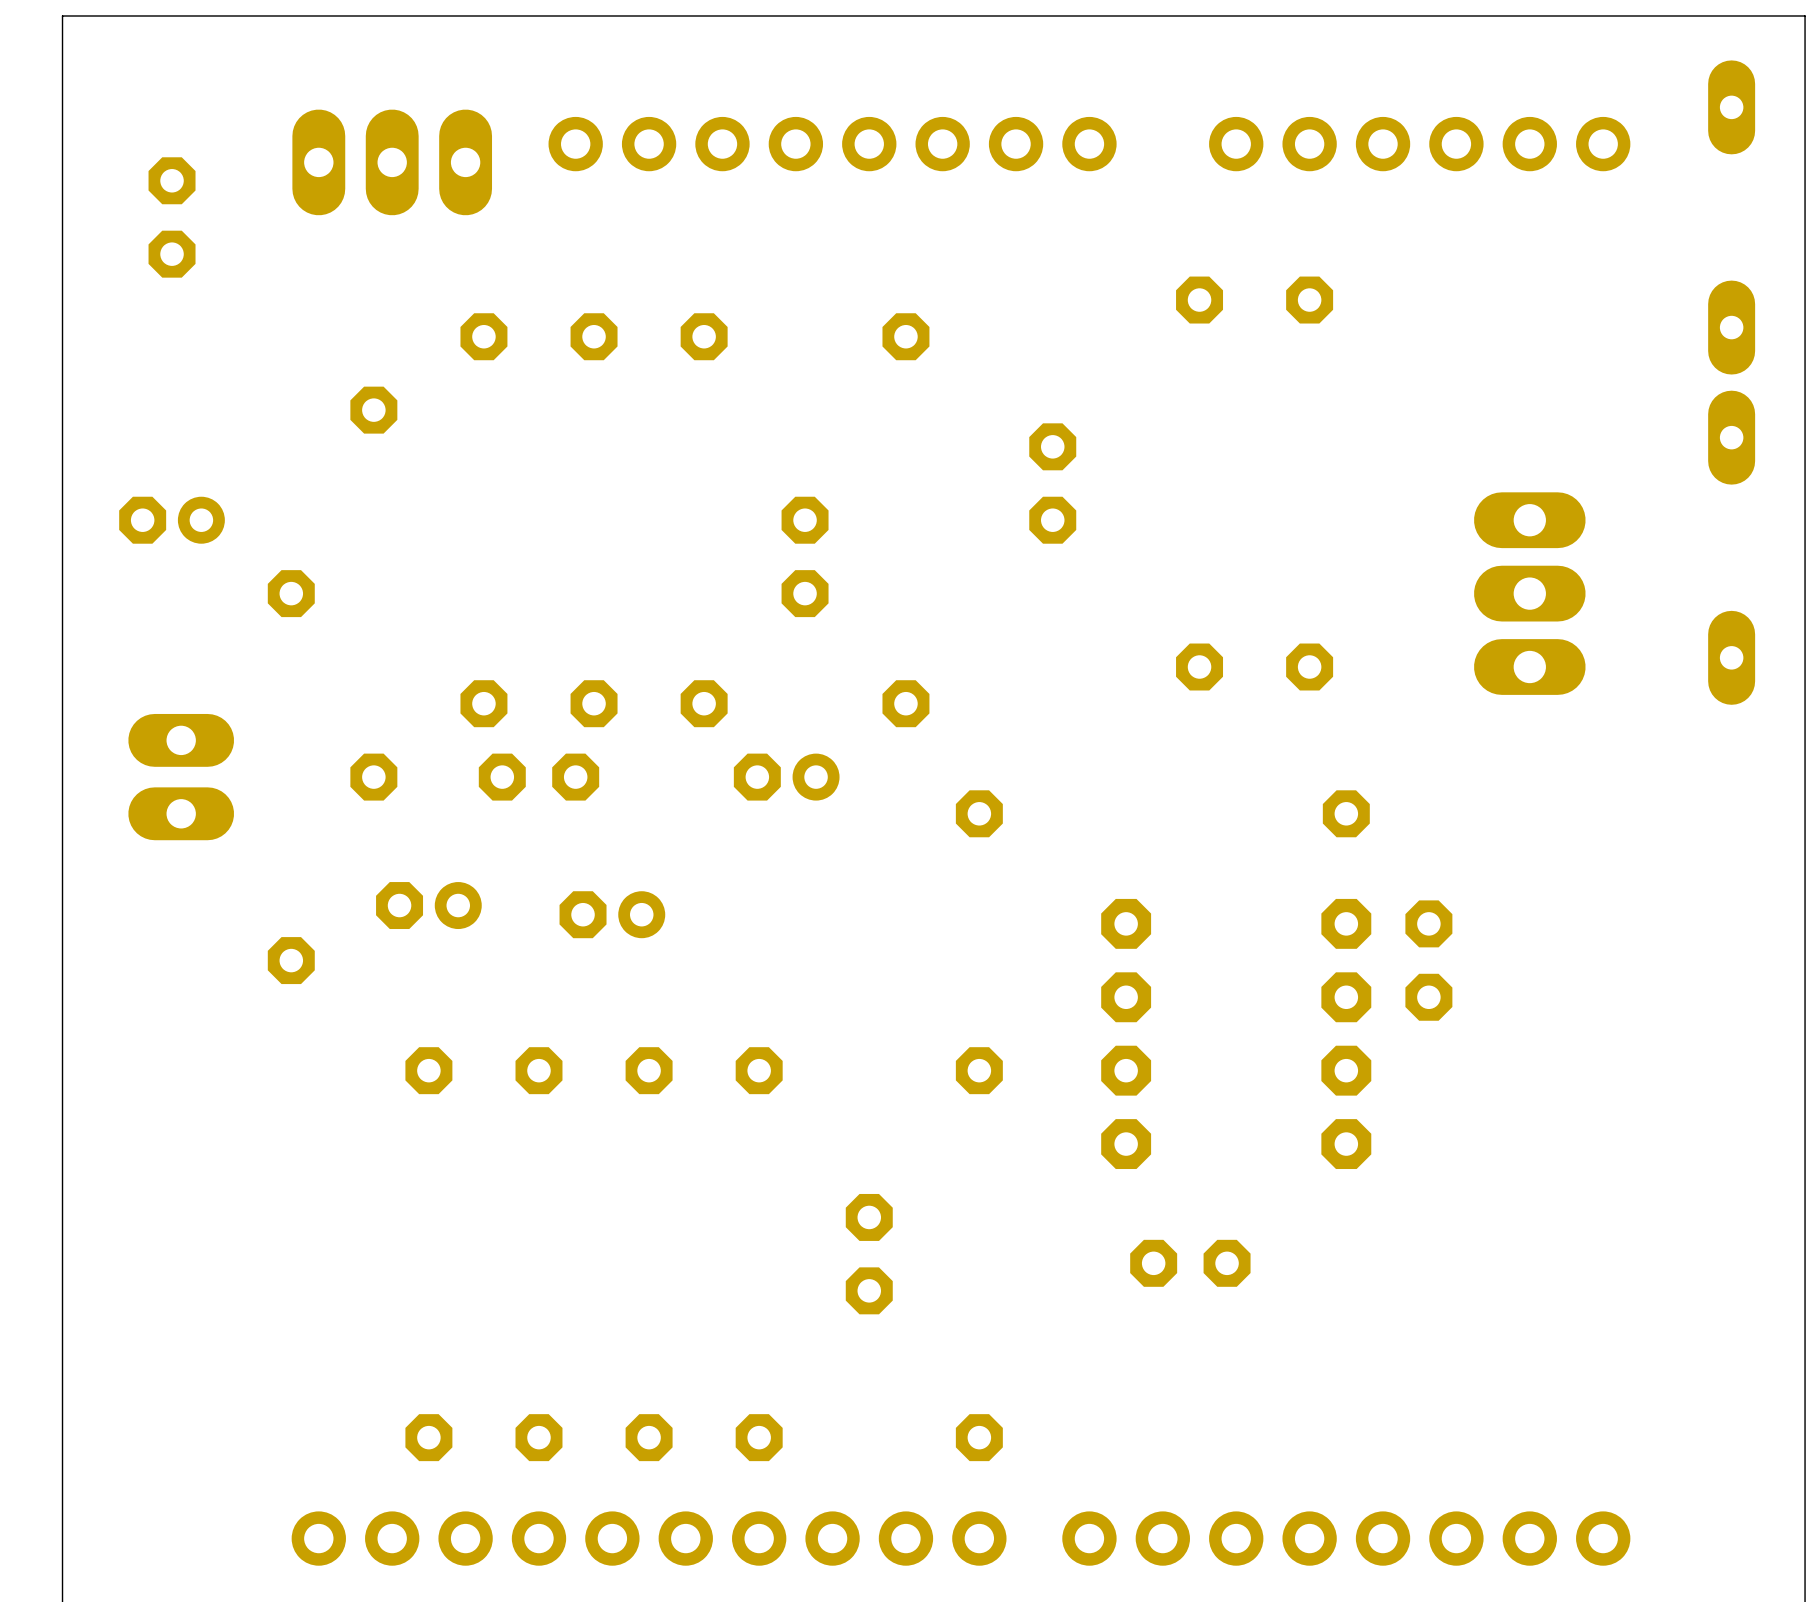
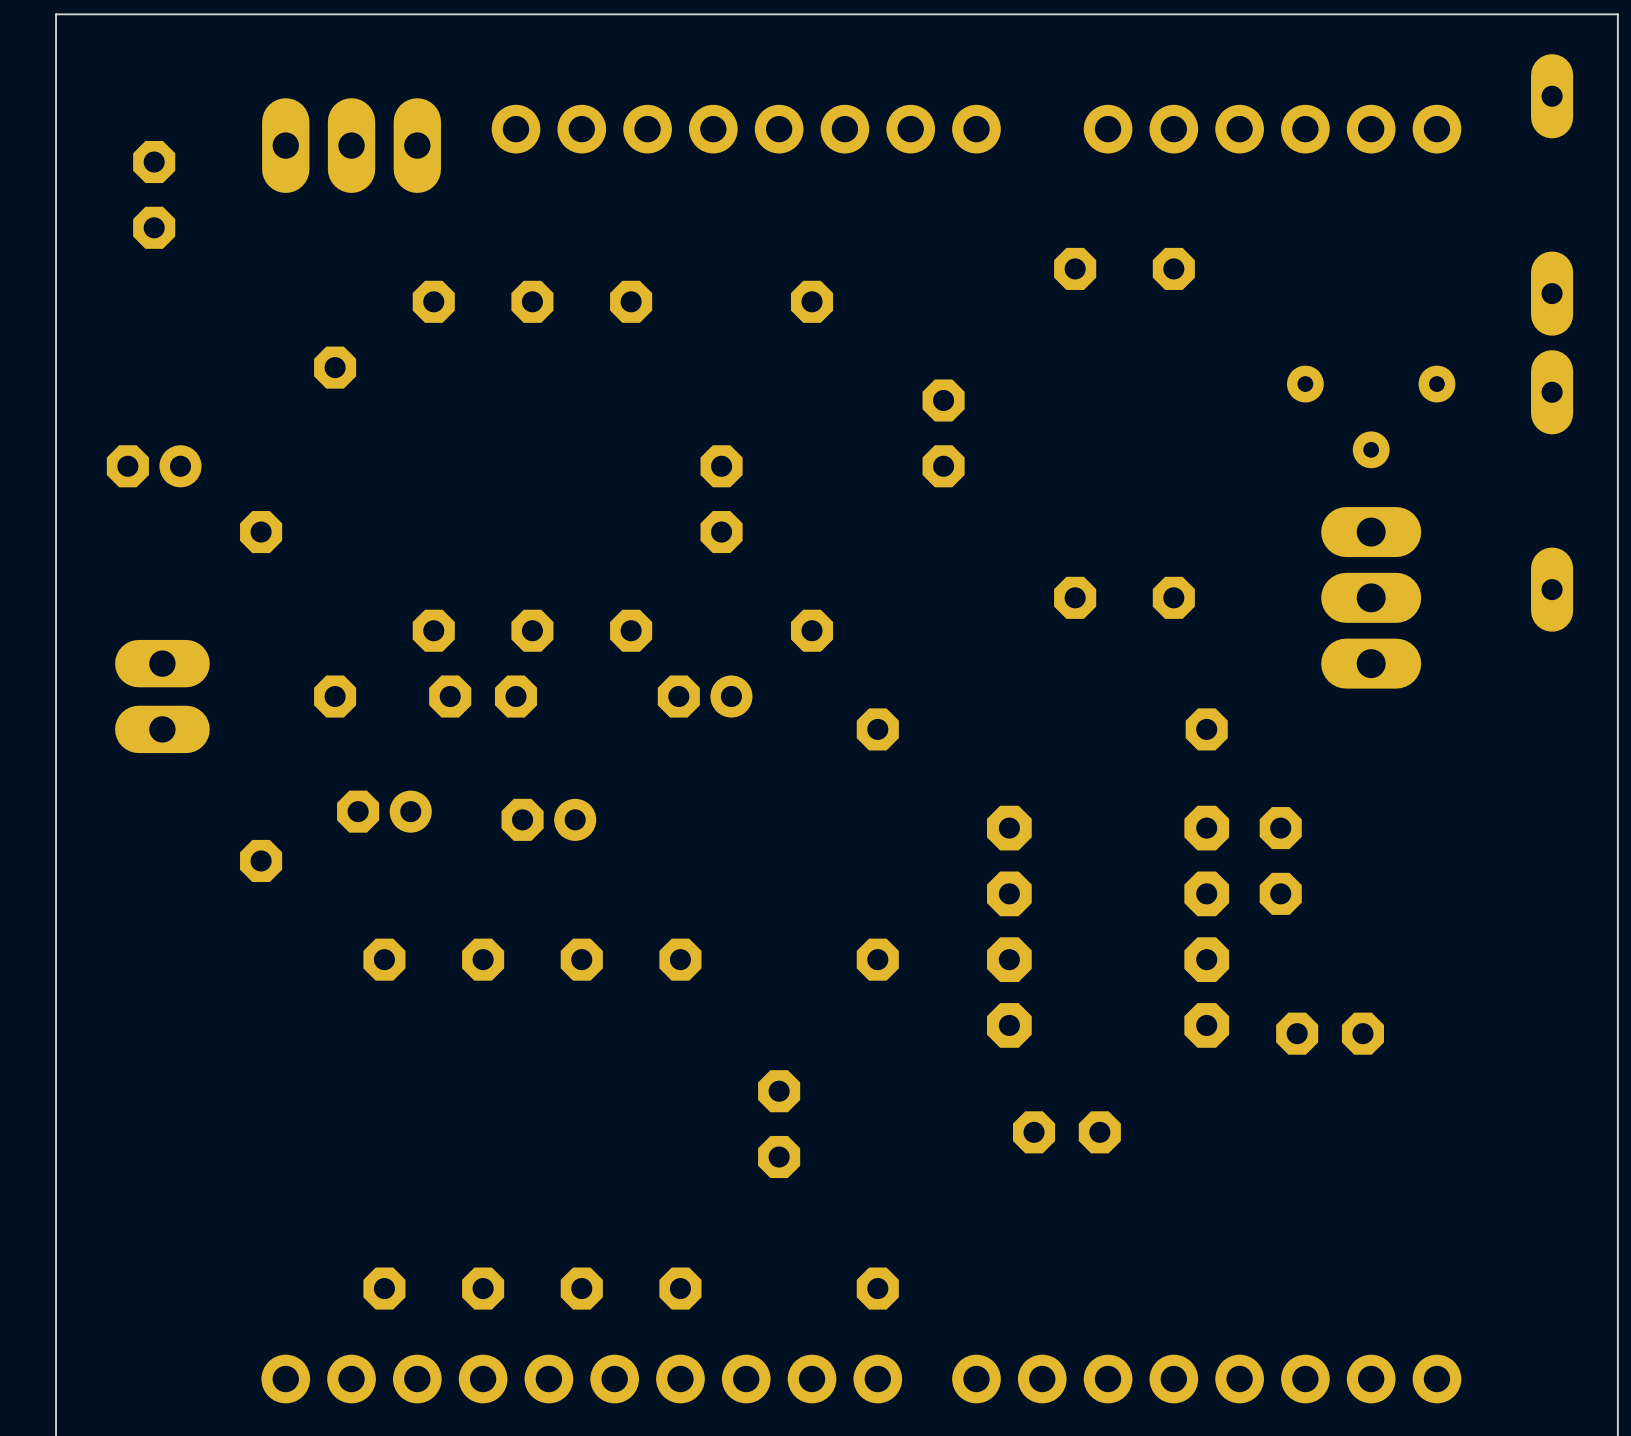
part: none -> (1371, 416)
part position: (1529, 593) -> (1371, 597)
part: none -> (1330, 1033)

